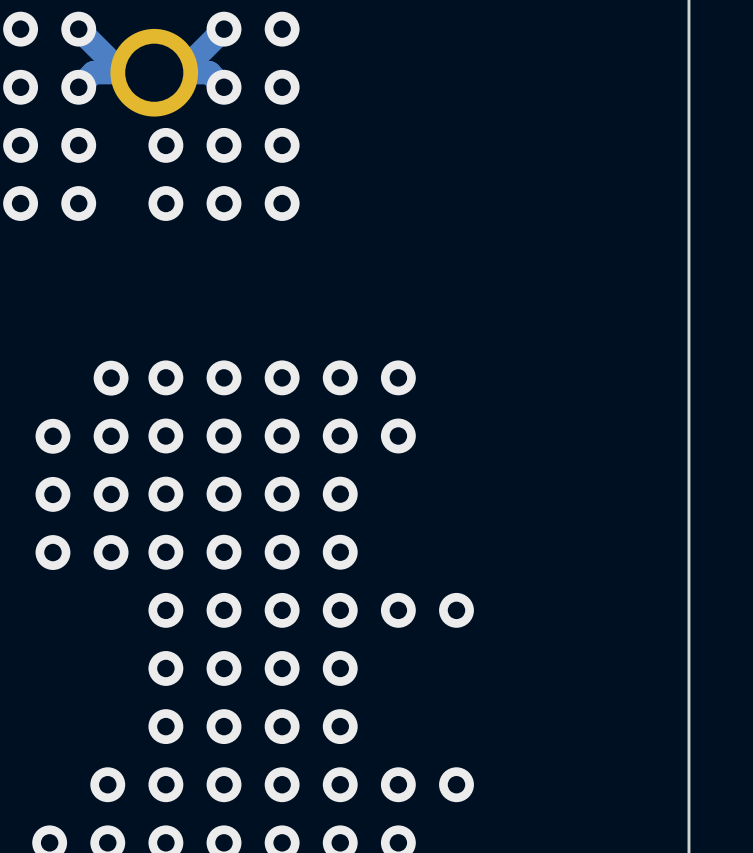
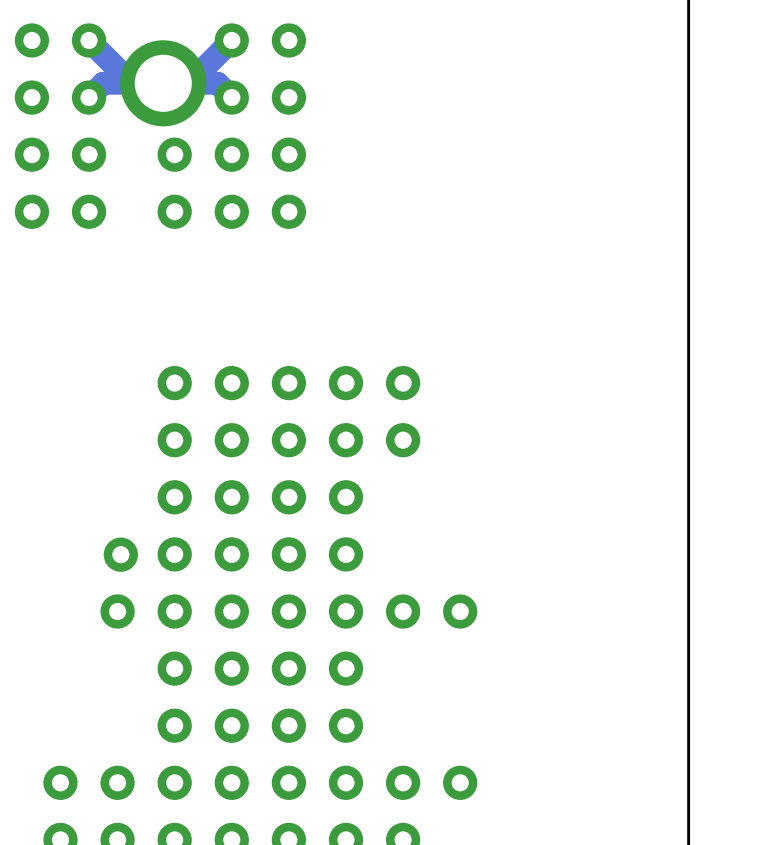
via: (111, 378) -> none
via: (52, 436) -> none
via: (111, 436) -> none
via: (52, 494) -> none
via: (111, 494) -> none
via: (52, 552) -> none
via: none -> (117, 611)
via: none -> (60, 782)

